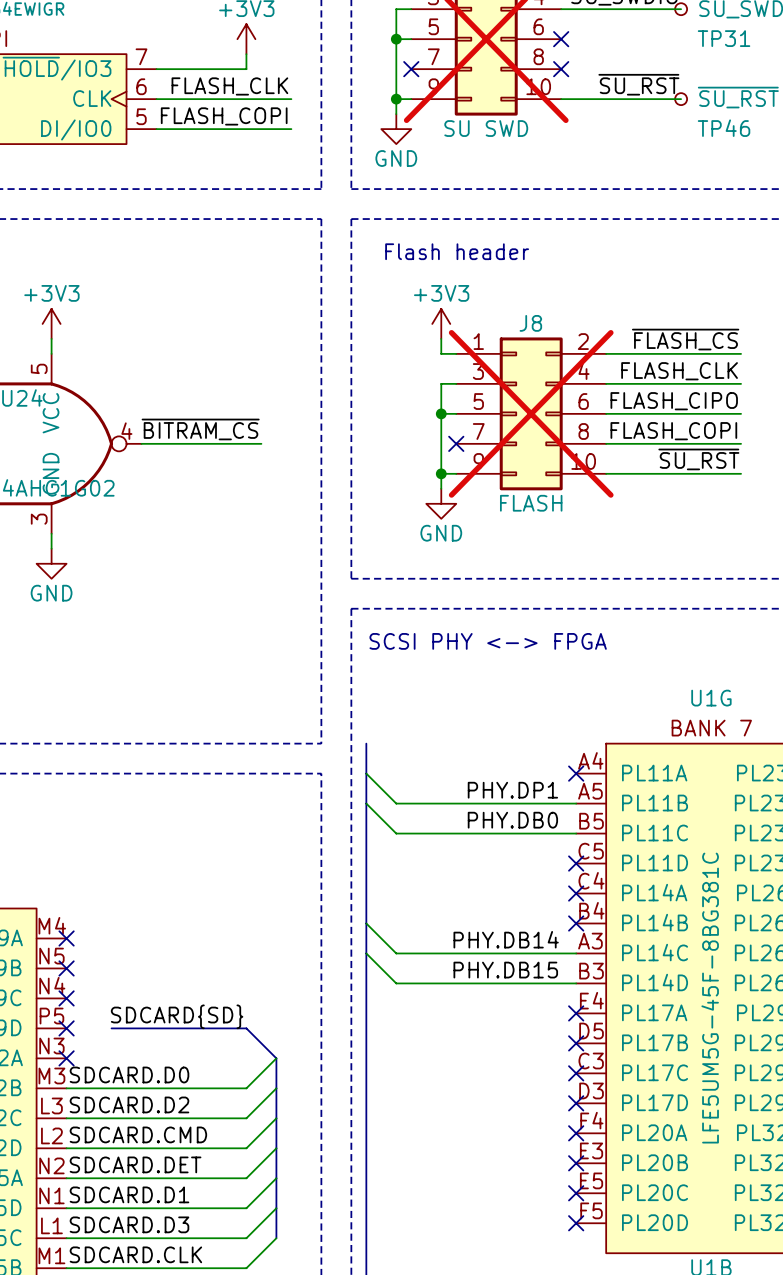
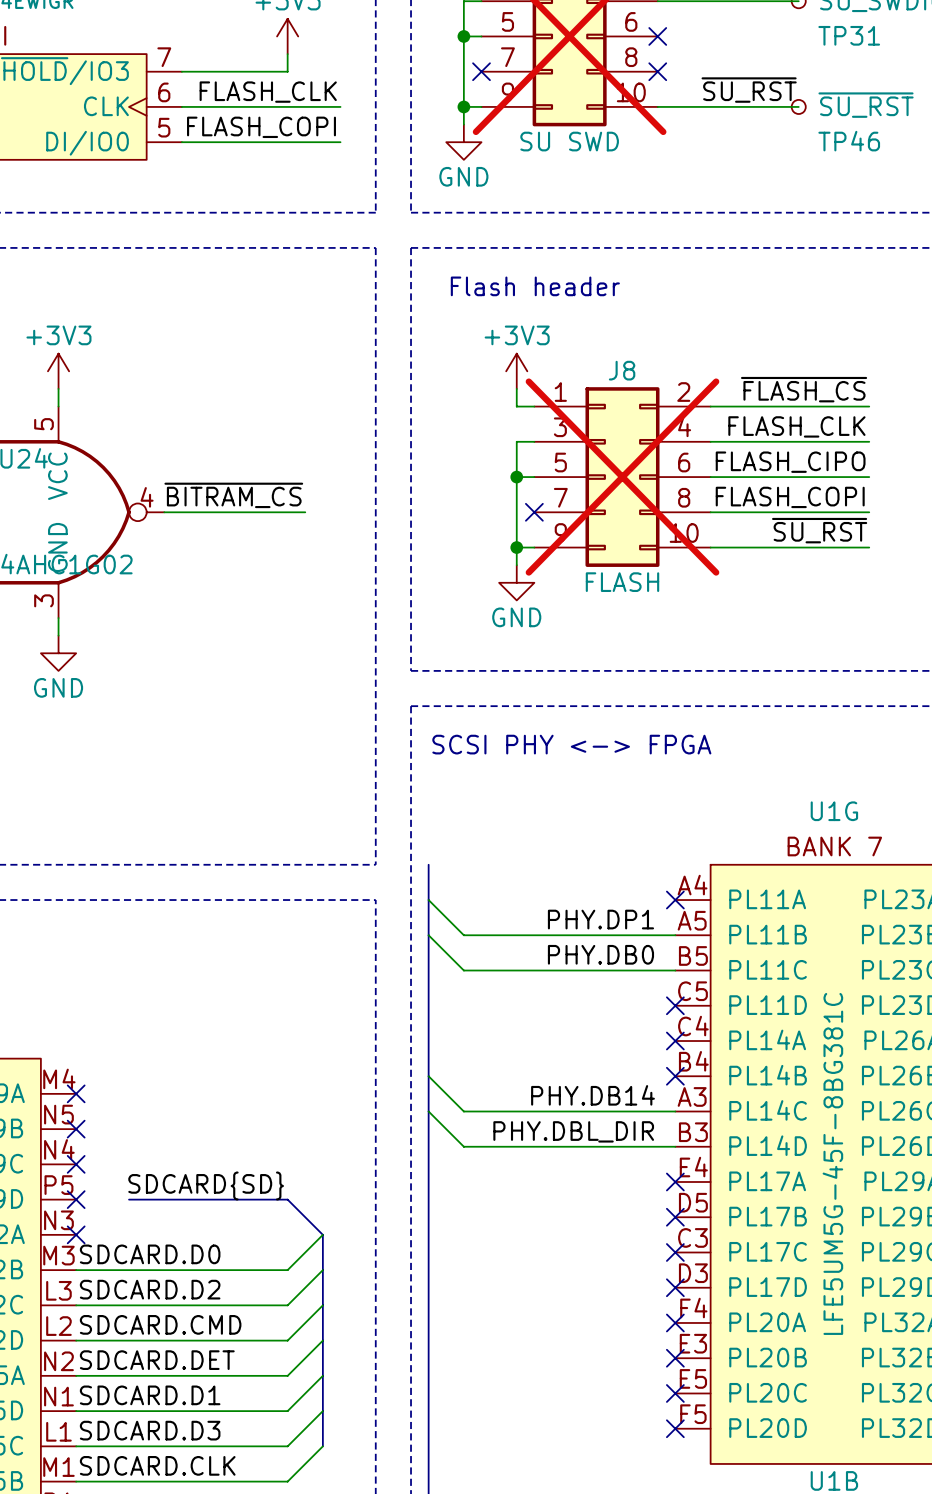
label: PHY.DB15 (505, 970) -> PHY.DBL_DIR (573, 1131)

